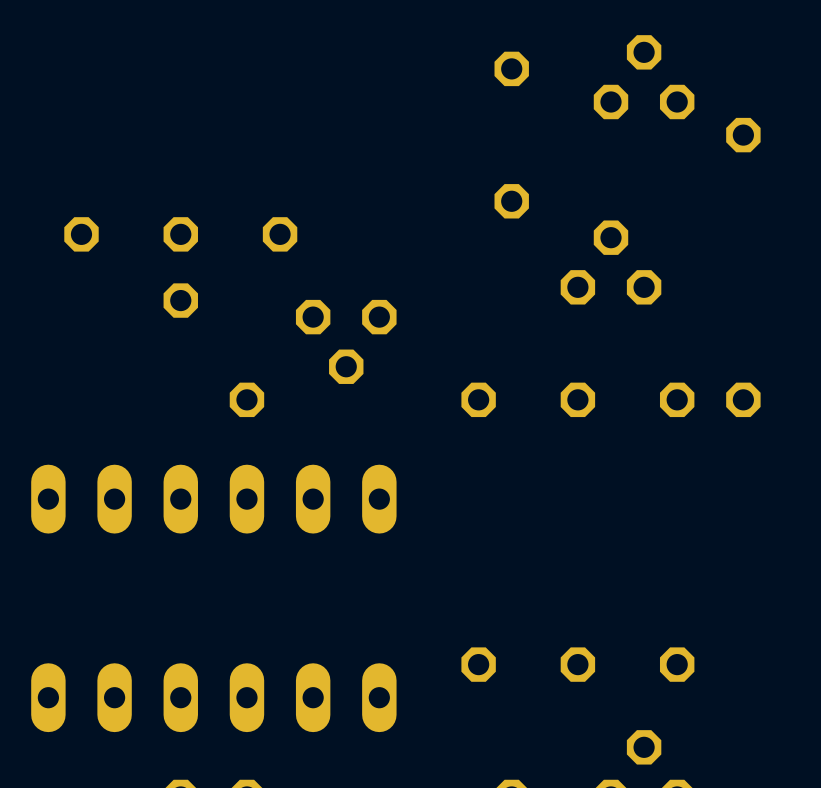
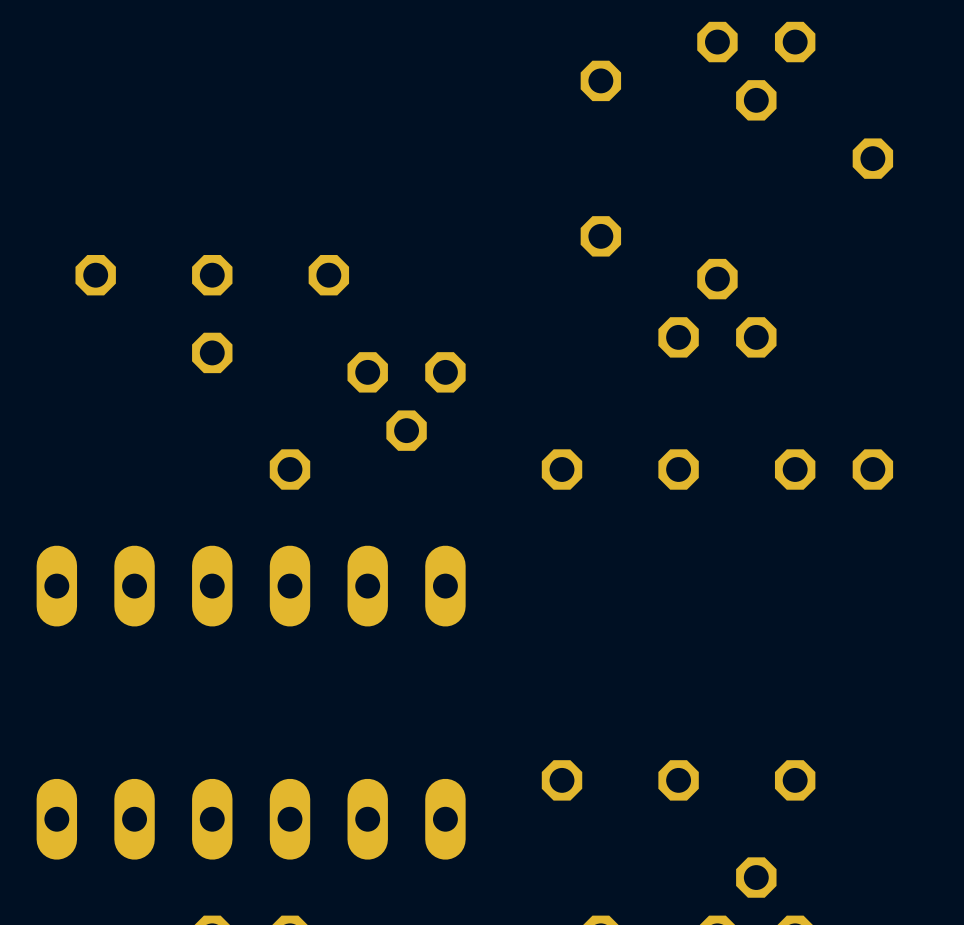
part rotation: 0° (644, 77) -> 180° (756, 71)

